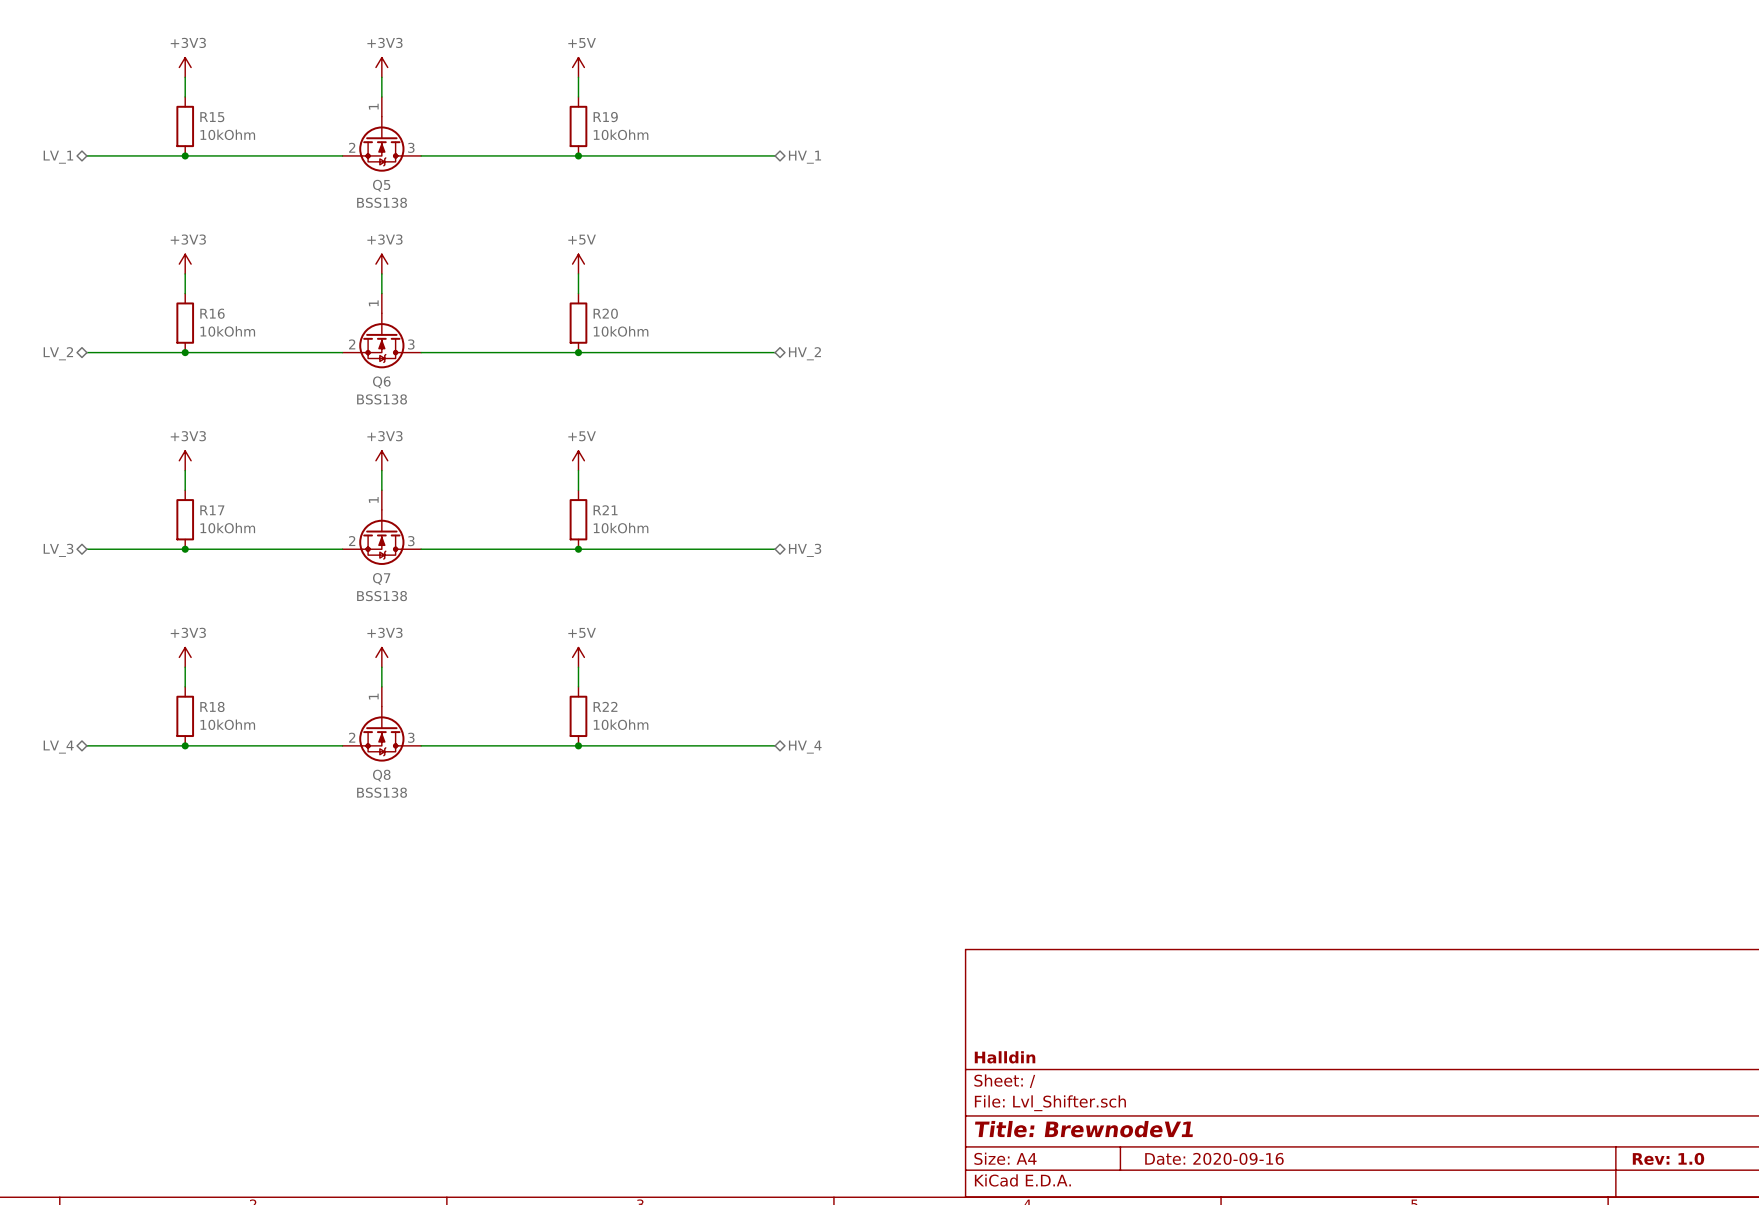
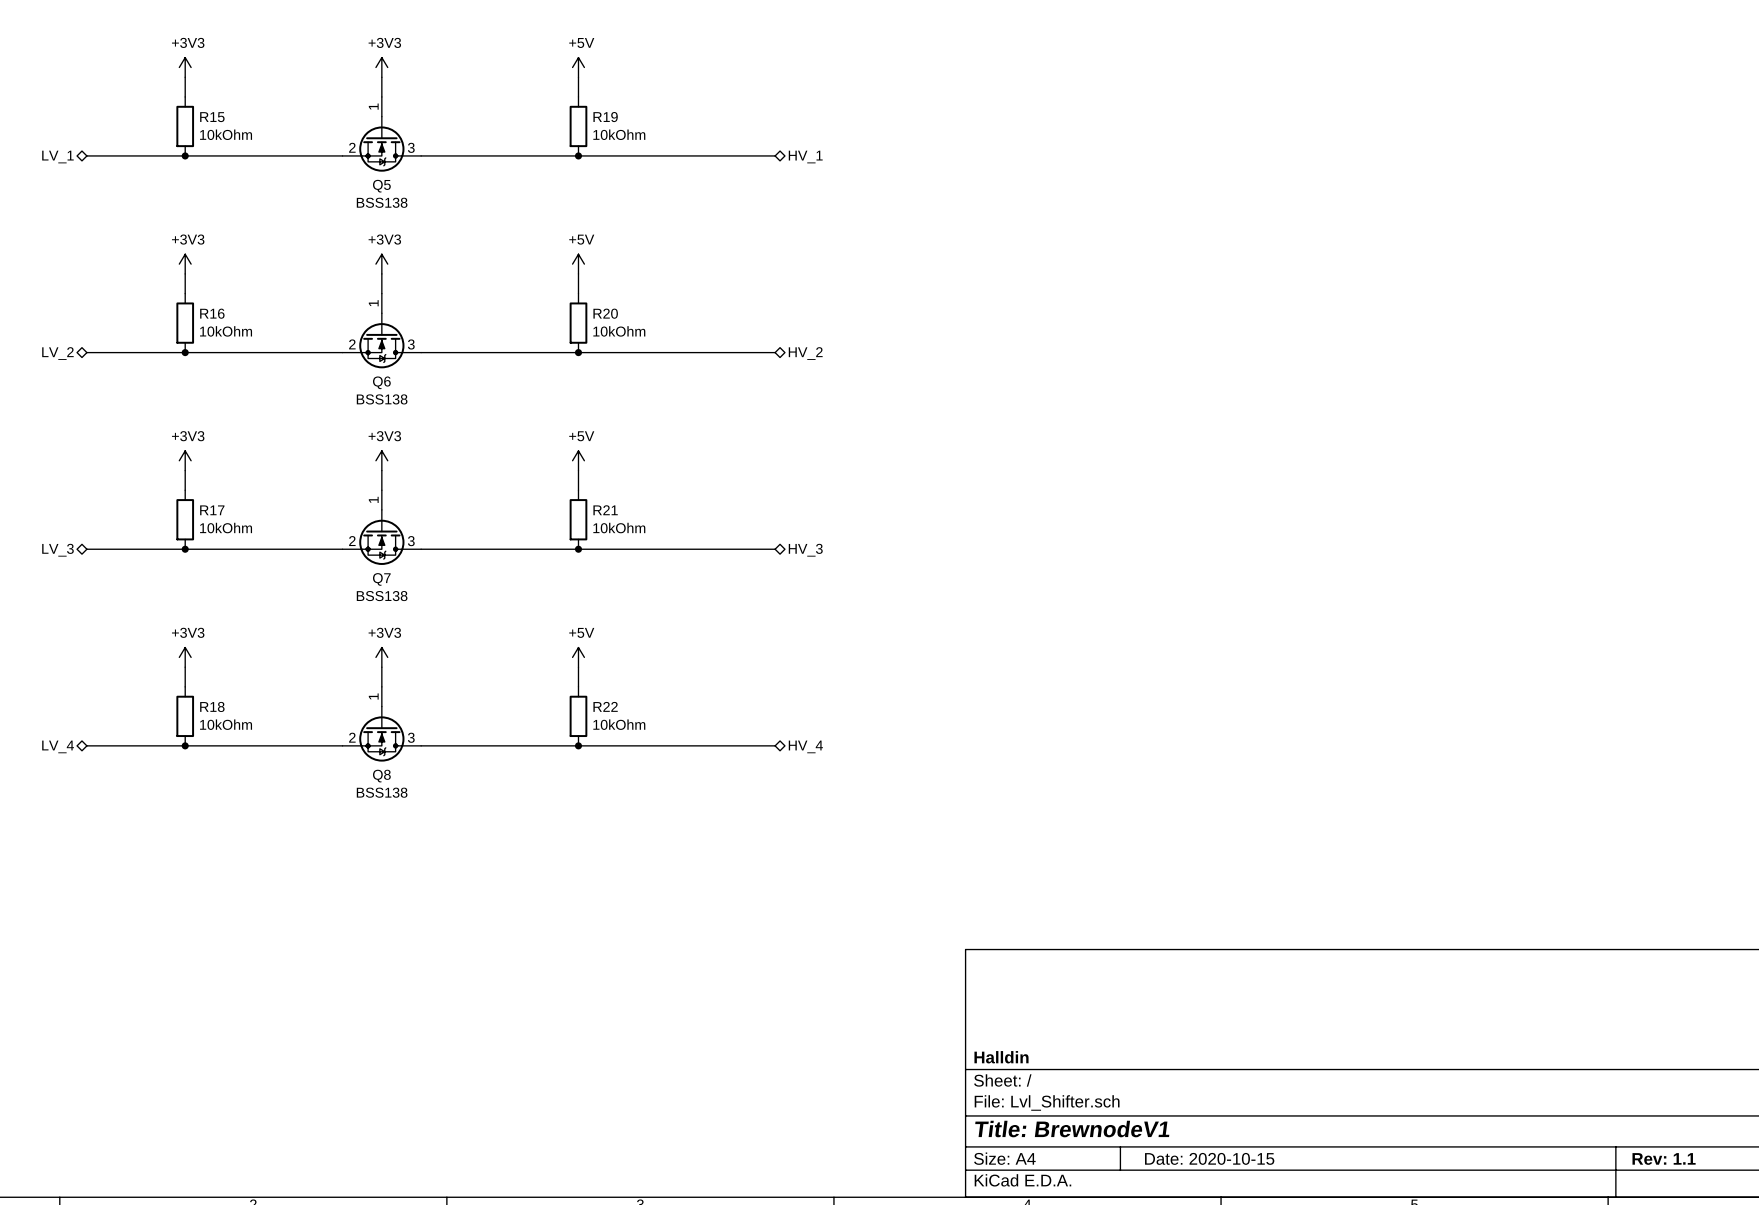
title block: Date: 2020-09-16 (1214, 1158) -> Date: 2020-10-15 (1209, 1158)
title block: Rev: 1.0 (1668, 1158) -> Rev: 1.1 (1664, 1158)

